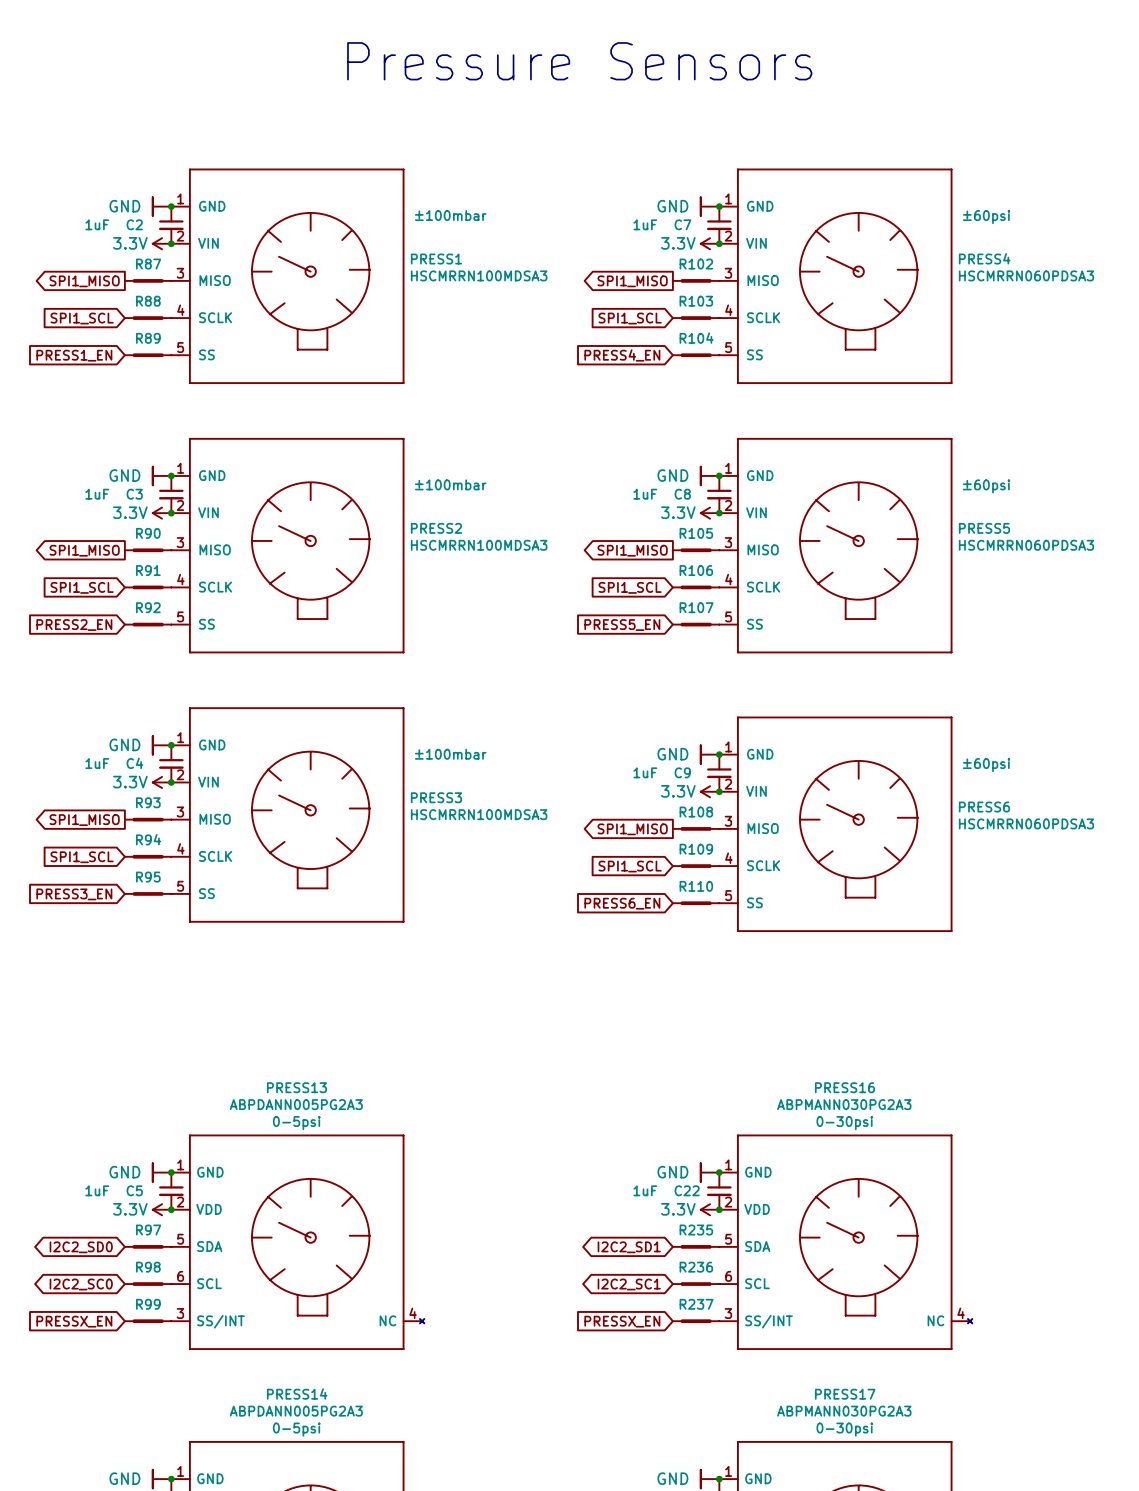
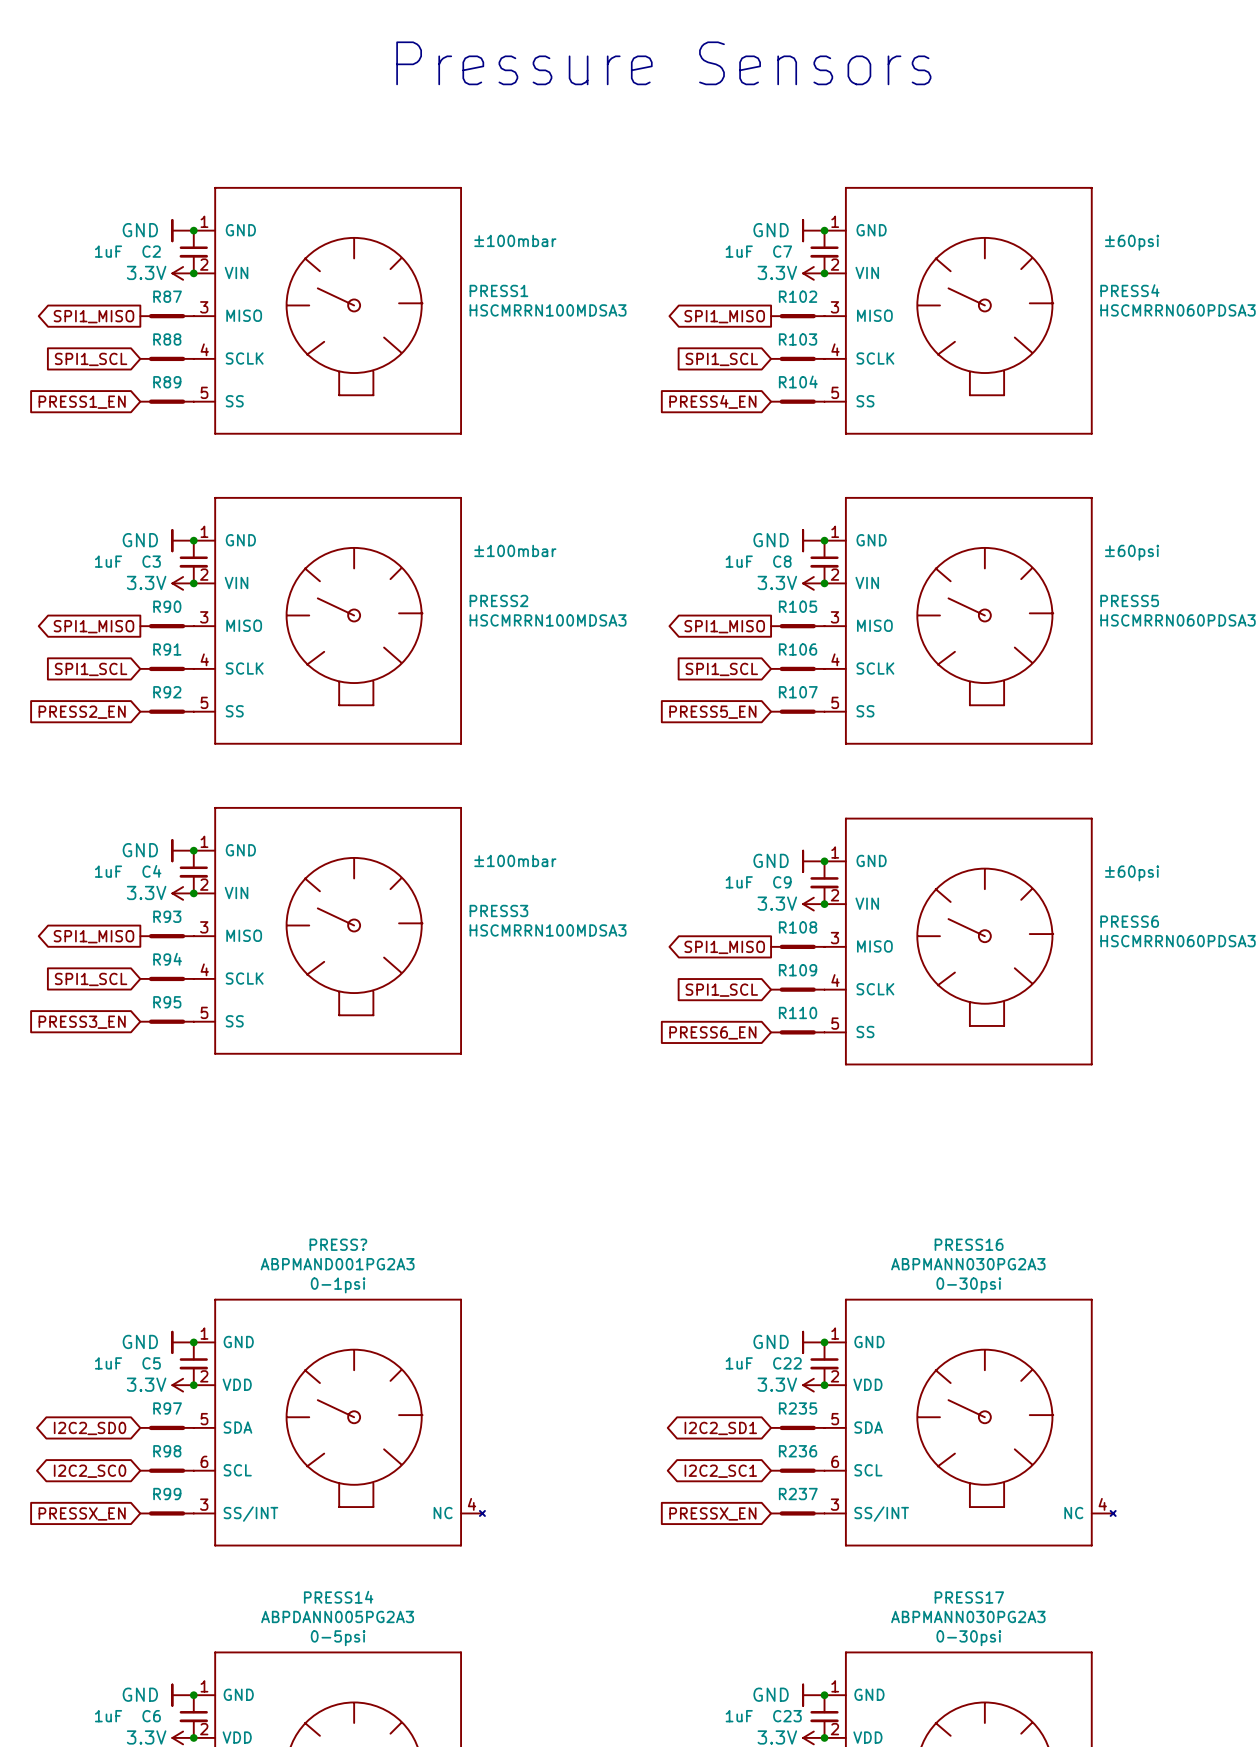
PRESS13 name: PRESS13 (296, 1087) -> PRESS? (338, 1244)
PRESS13 value: ABPDANN005PG2A3 (296, 1104) -> ABPMAND001PG2A3 (337, 1264)
PRESS13 text: 0-5psi (296, 1123) -> 0-1psi (338, 1285)

